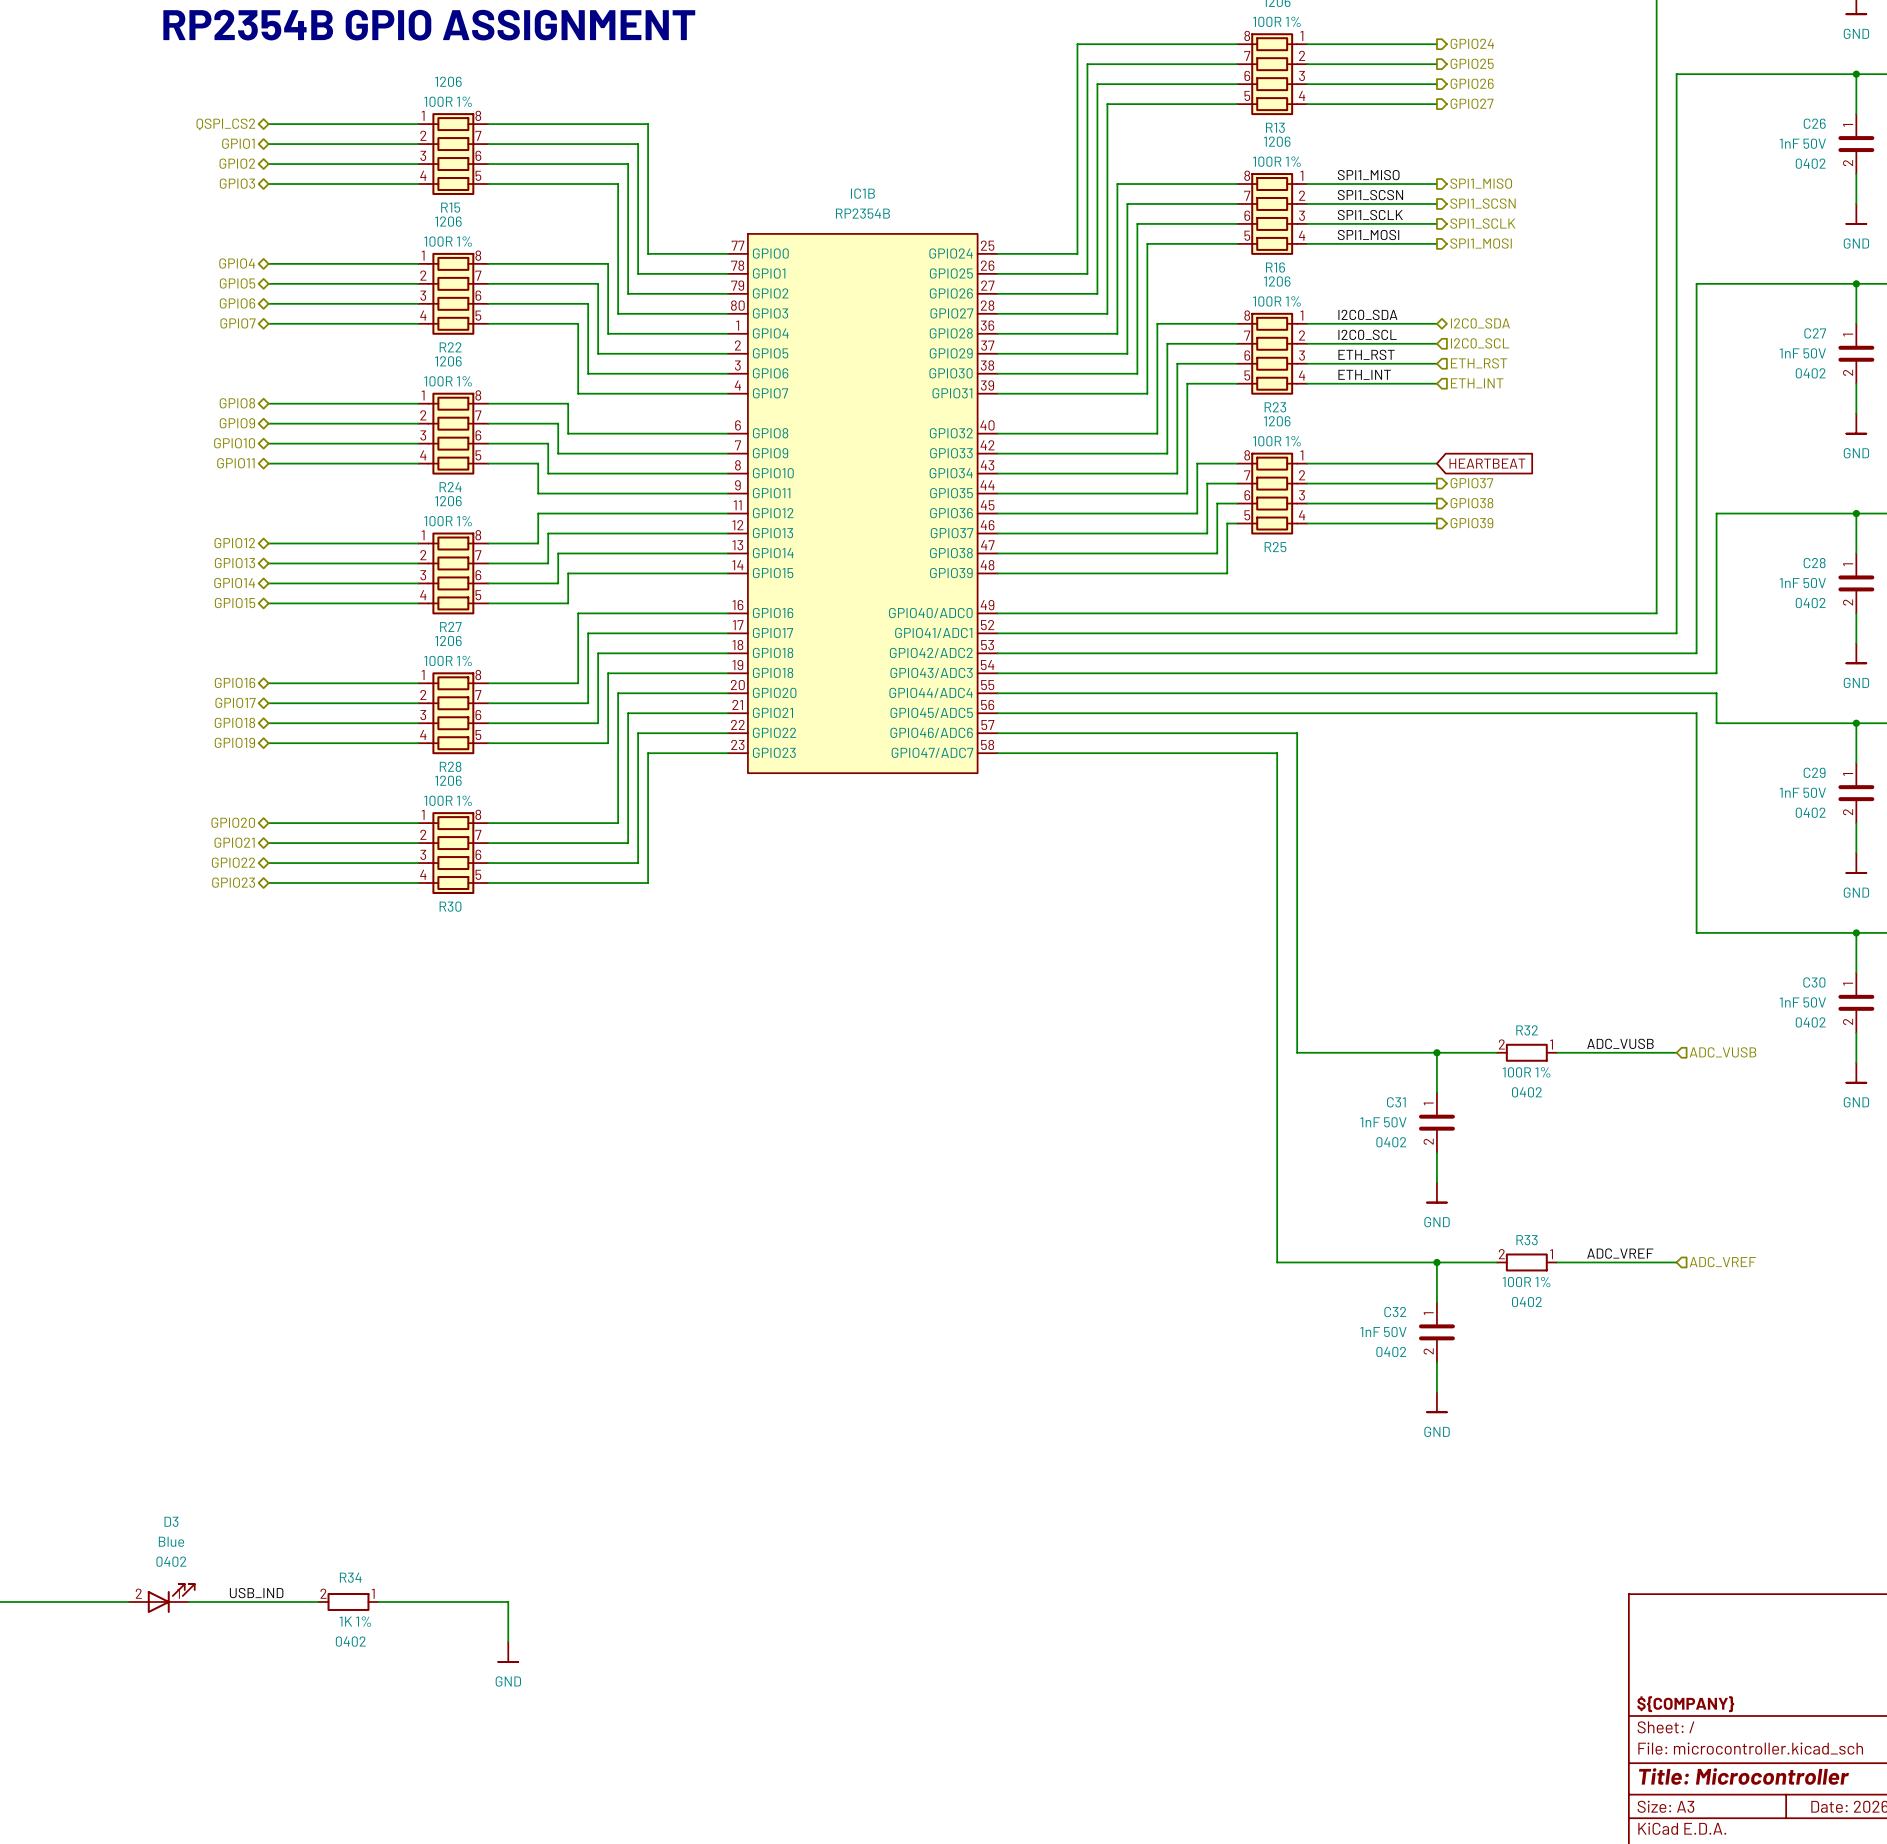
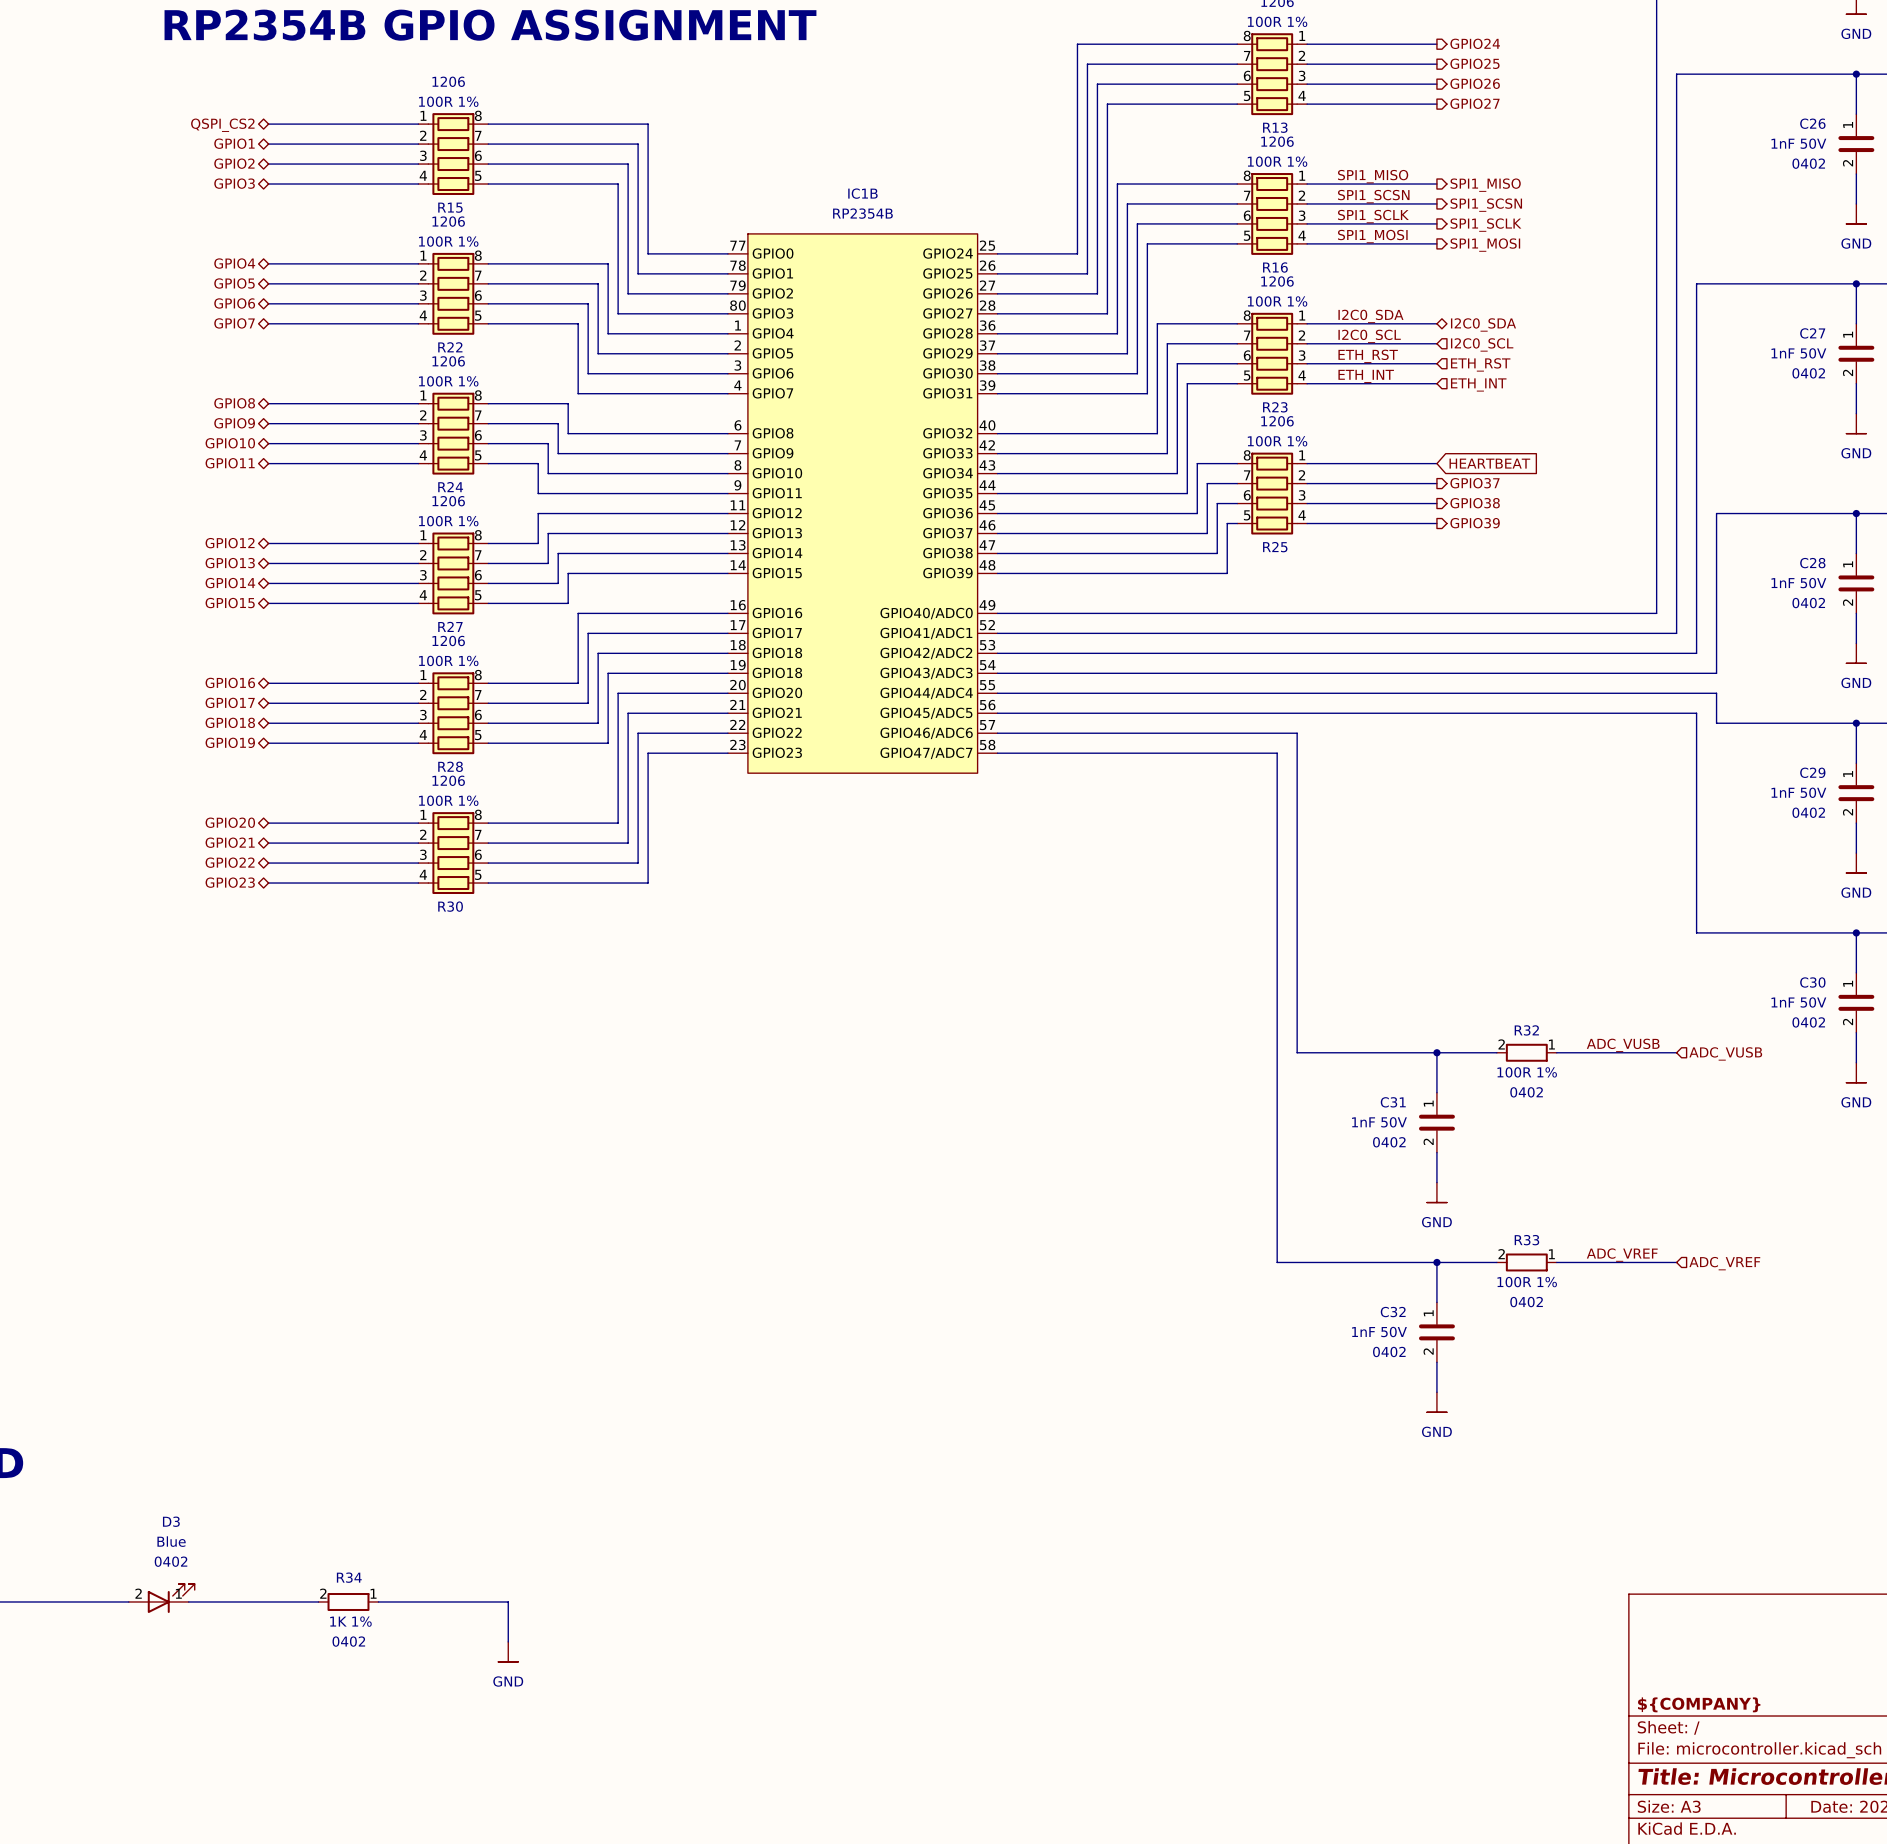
label: USB_IND (256, 1593) -> none

